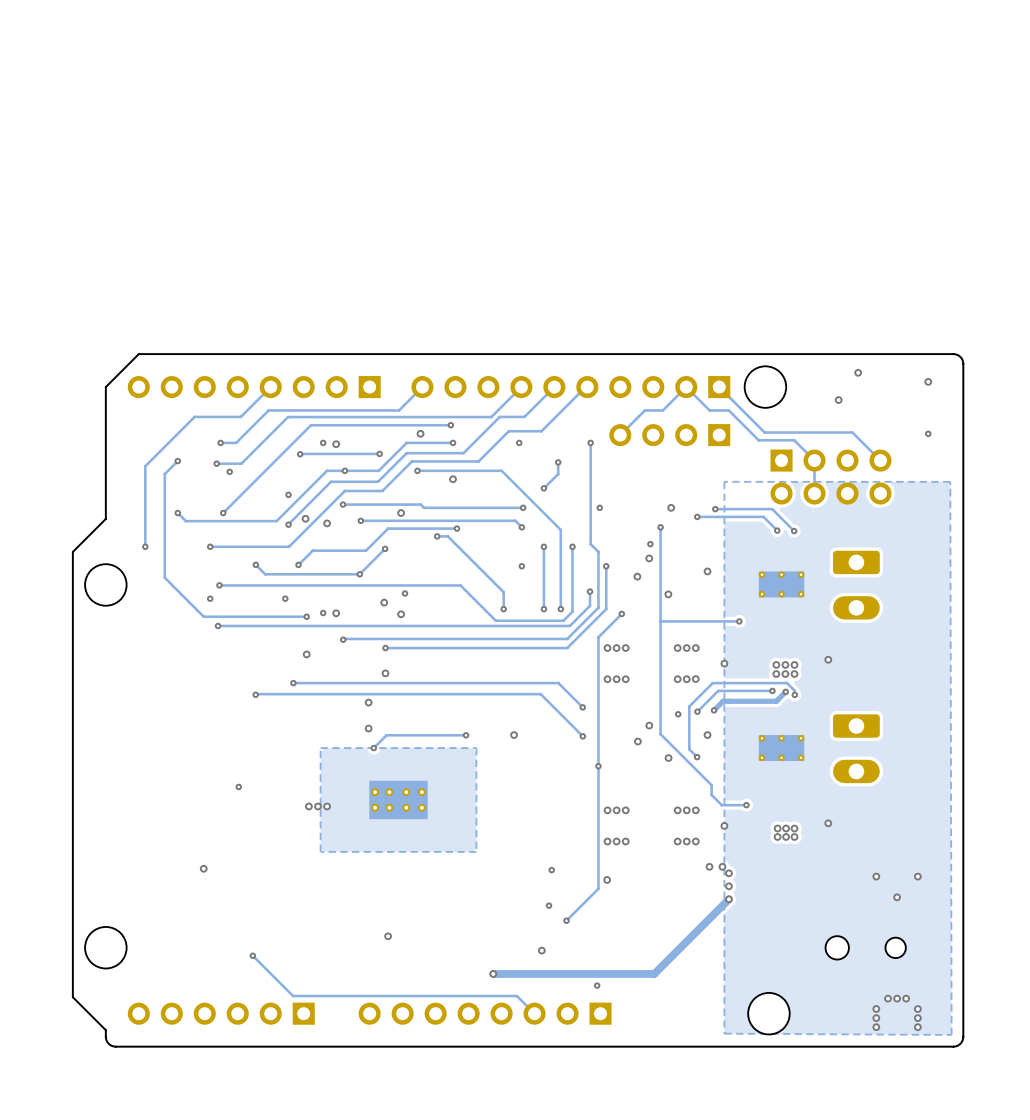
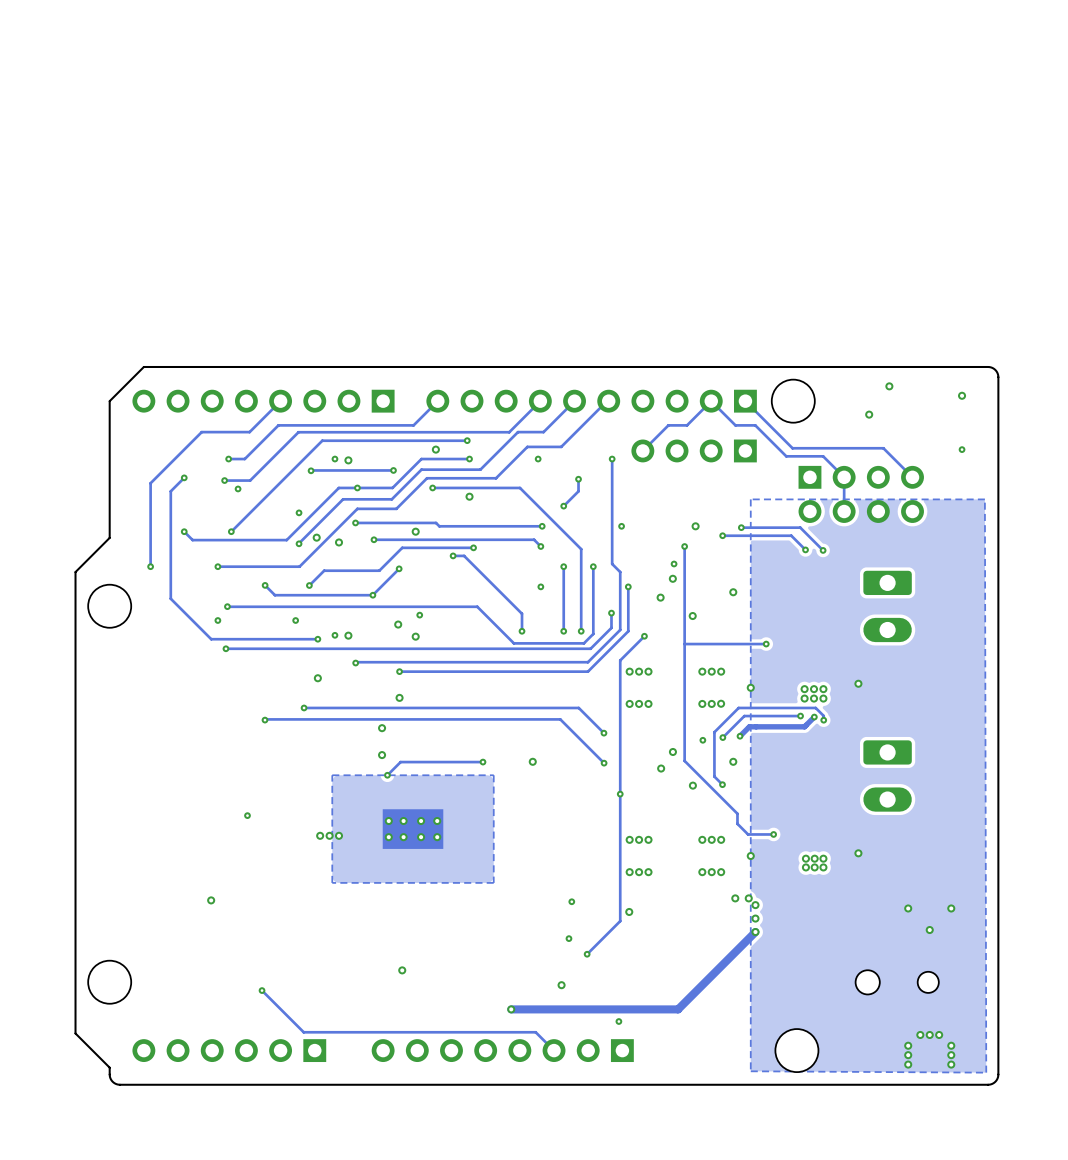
part: (781, 584) -> none
part: (781, 748) -> none

